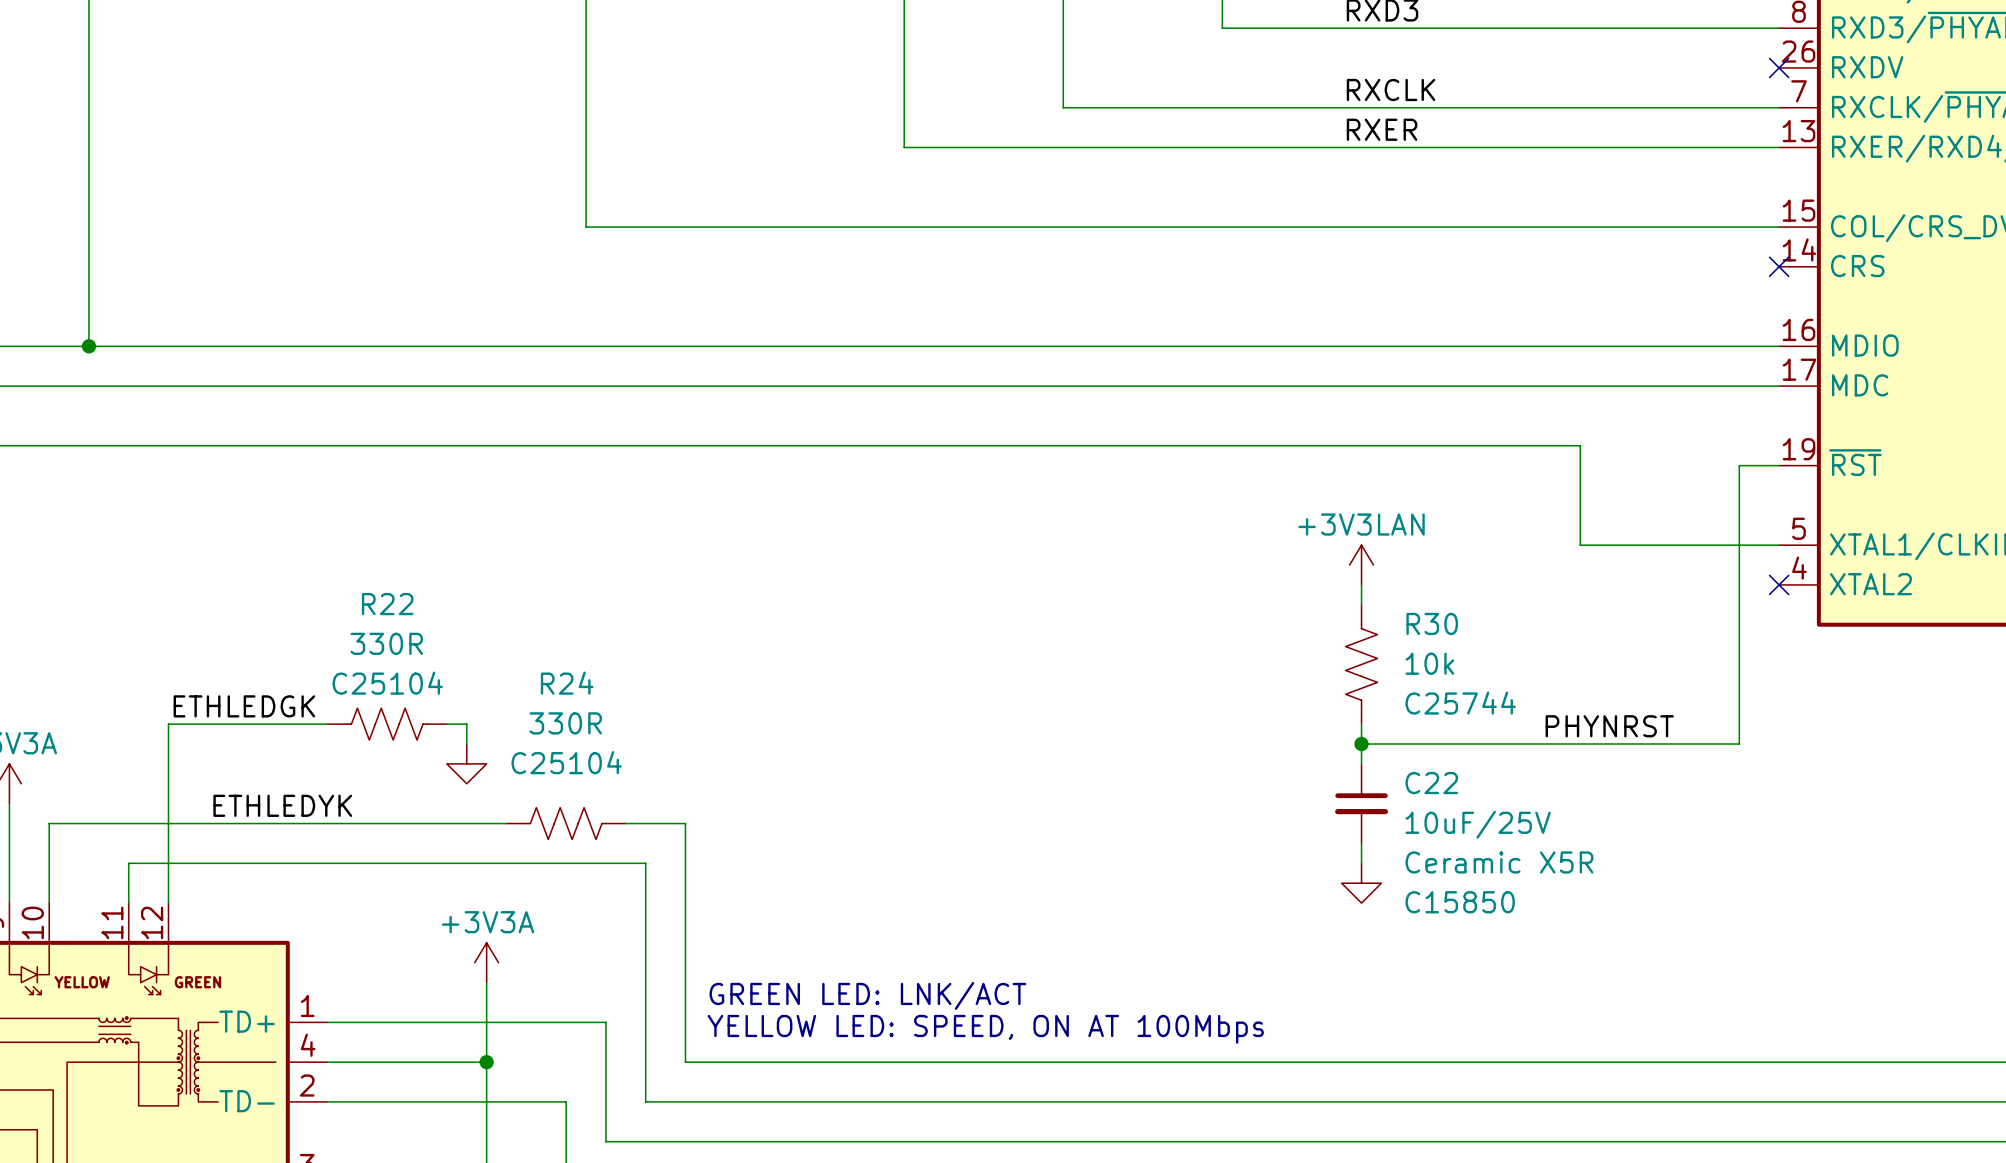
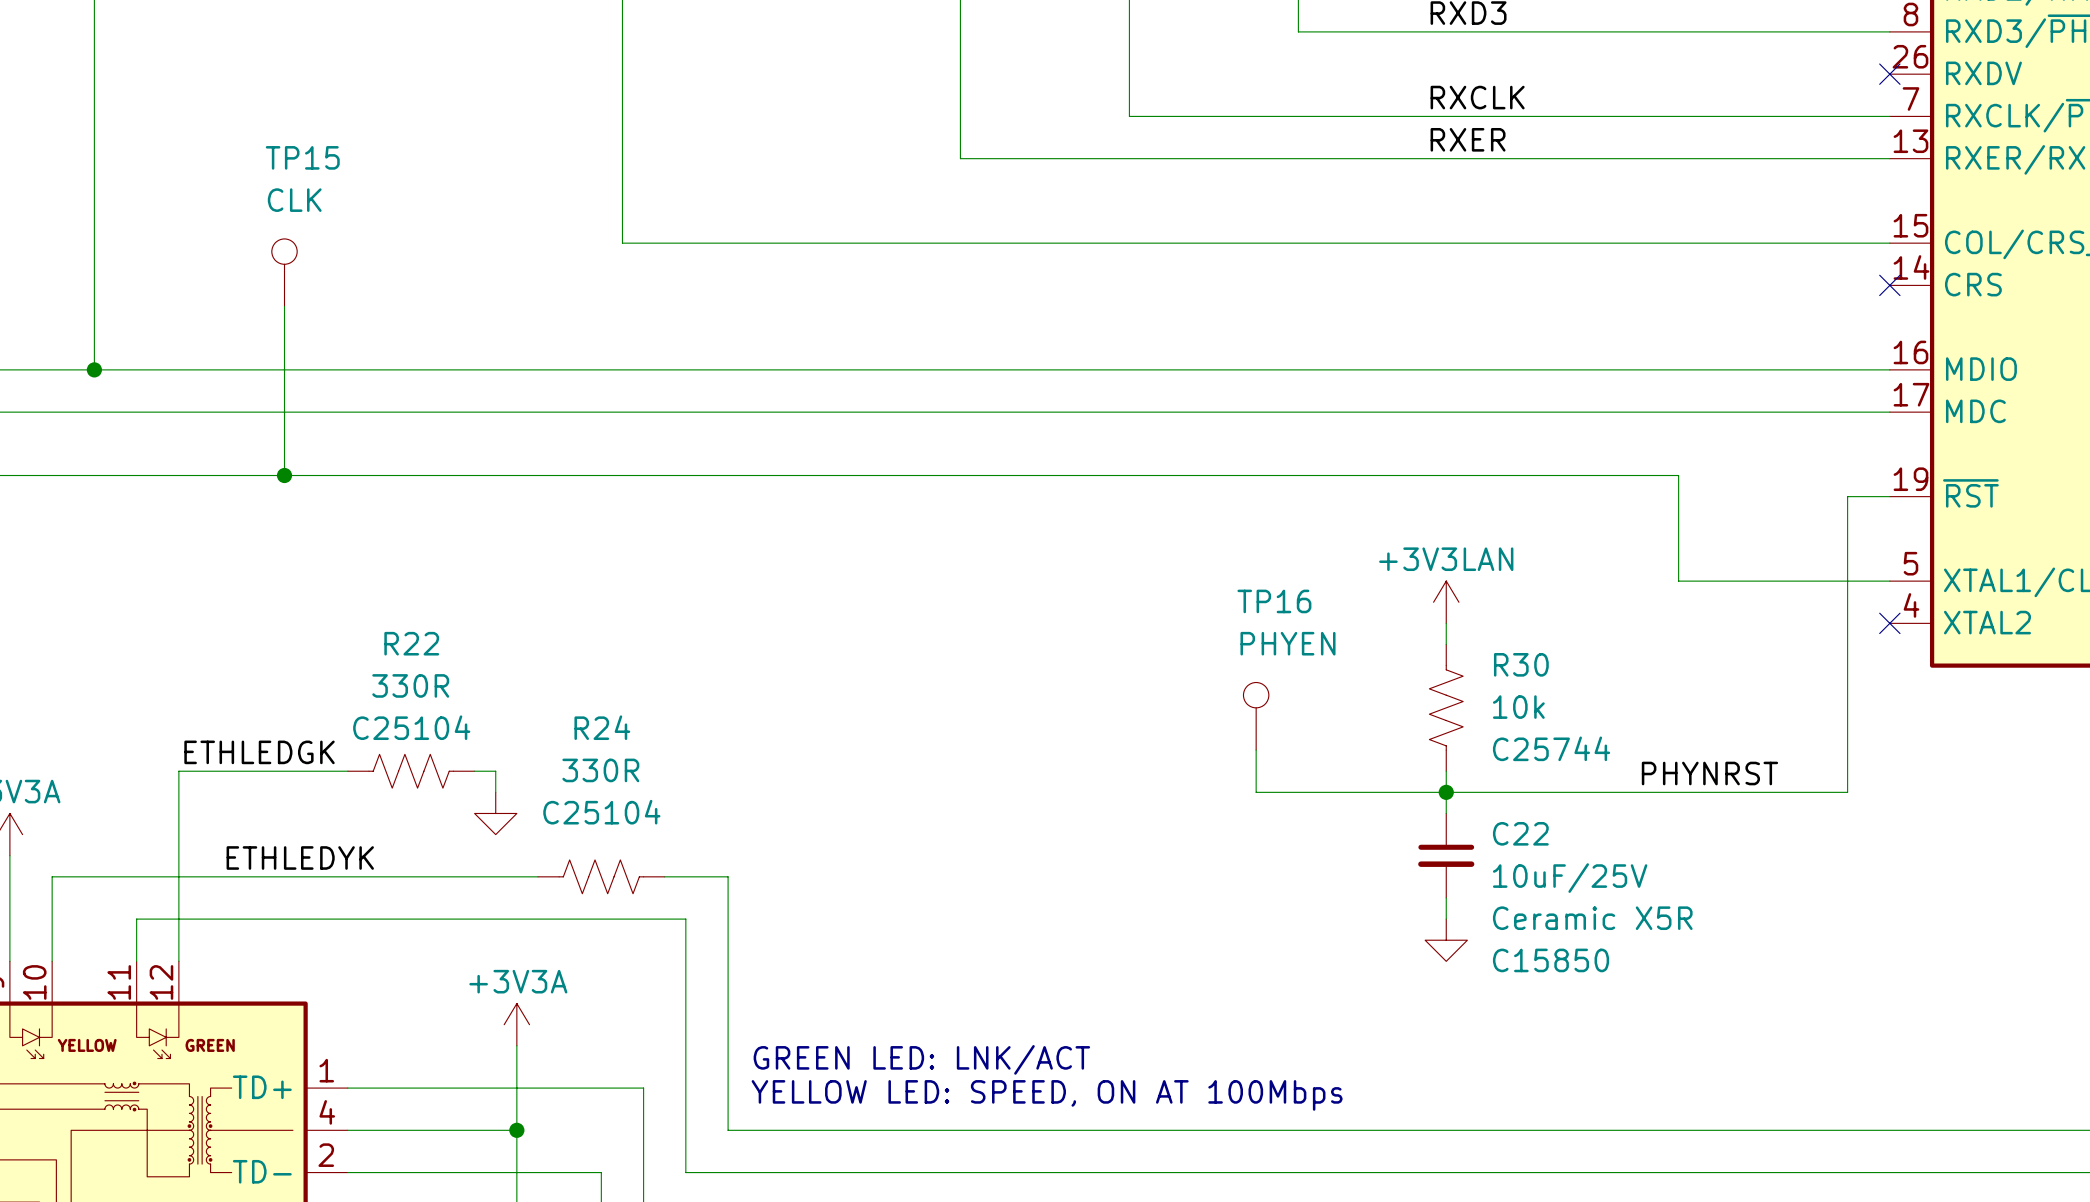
TP15: none -> CLK (284, 272)
wire: none -> (284, 306) (284, 475)
junction: none -> (284, 475)
TP16: none -> PHYEN (1256, 716)
wire: none -> (1256, 750) (1256, 792) (1446, 792)

